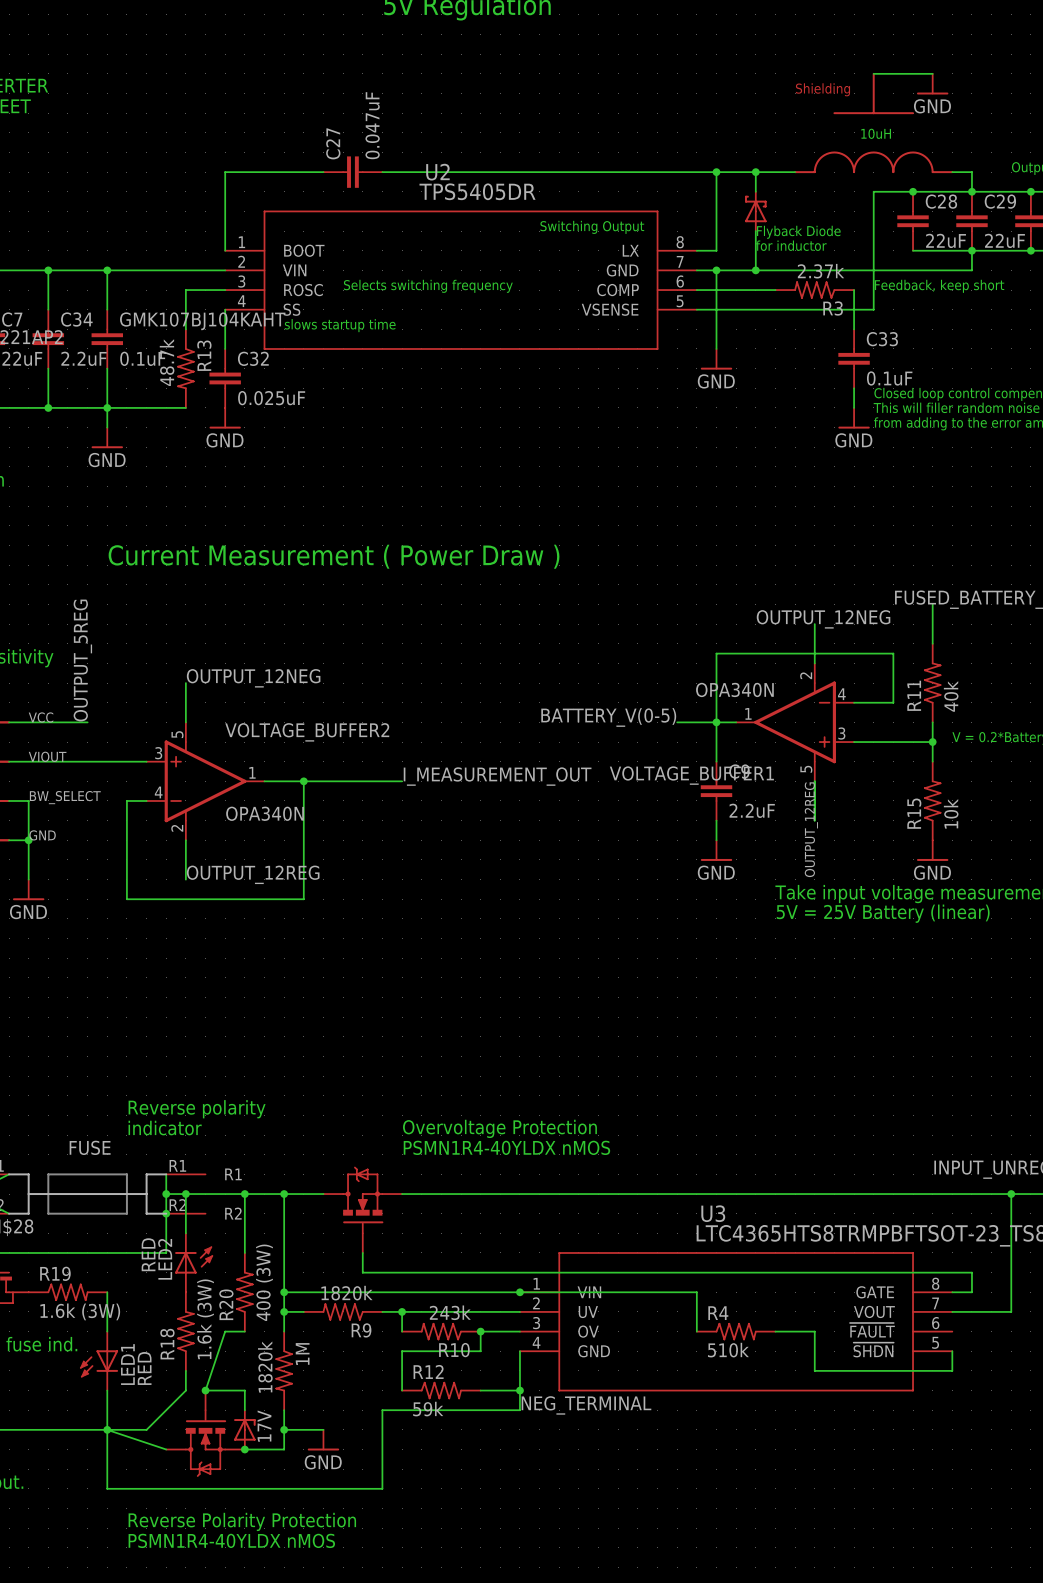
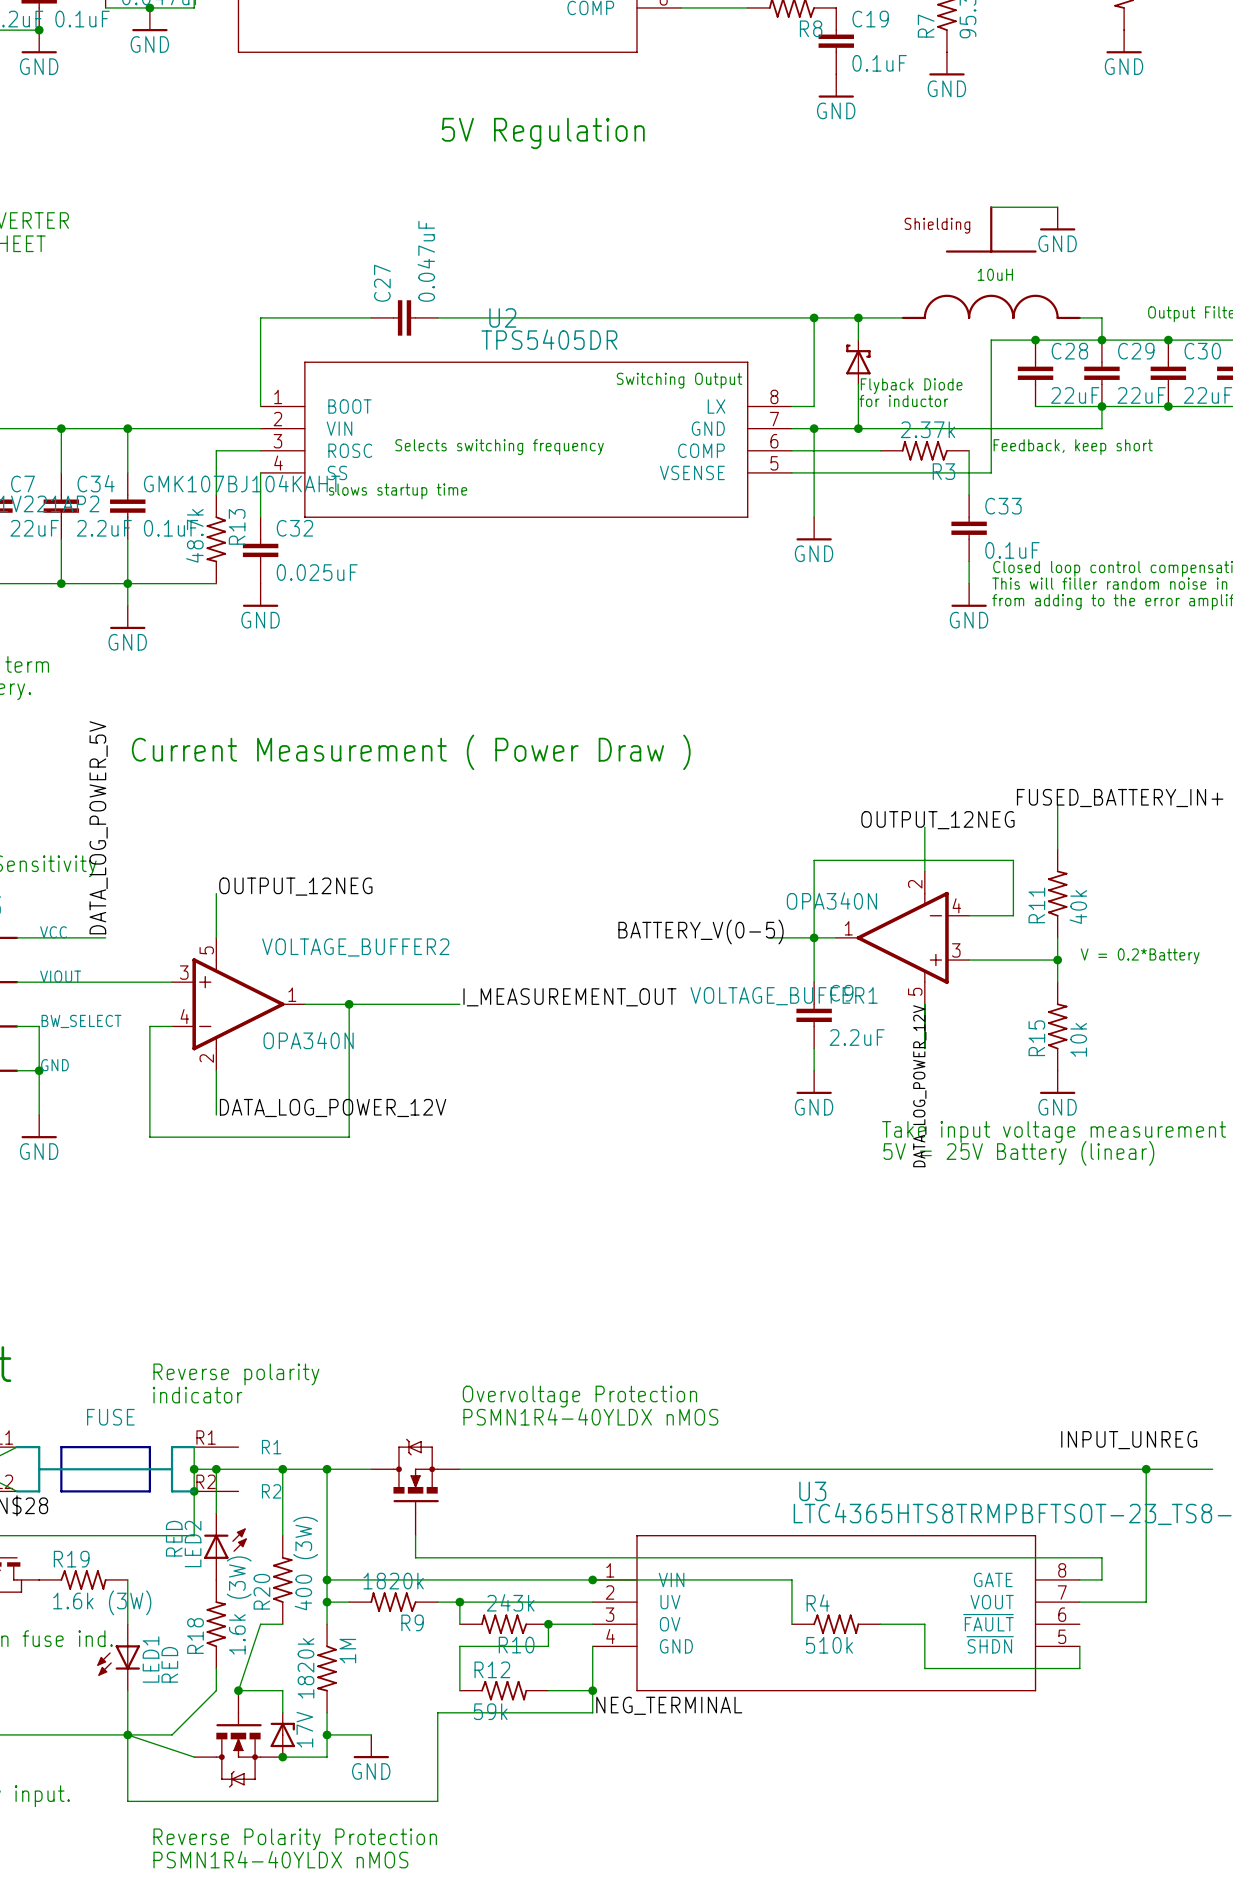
label: OUTPUT_5REG (82, 660) -> DATA_LOG_POWER_5V (98, 827)
label: OUTPUT_12REG (811, 829) -> DATA_LOG_POWER_12V (919, 1086)
label: OUTPUT_12REG (253, 874) -> DATA_LOG_POWER_12V (333, 1108)

